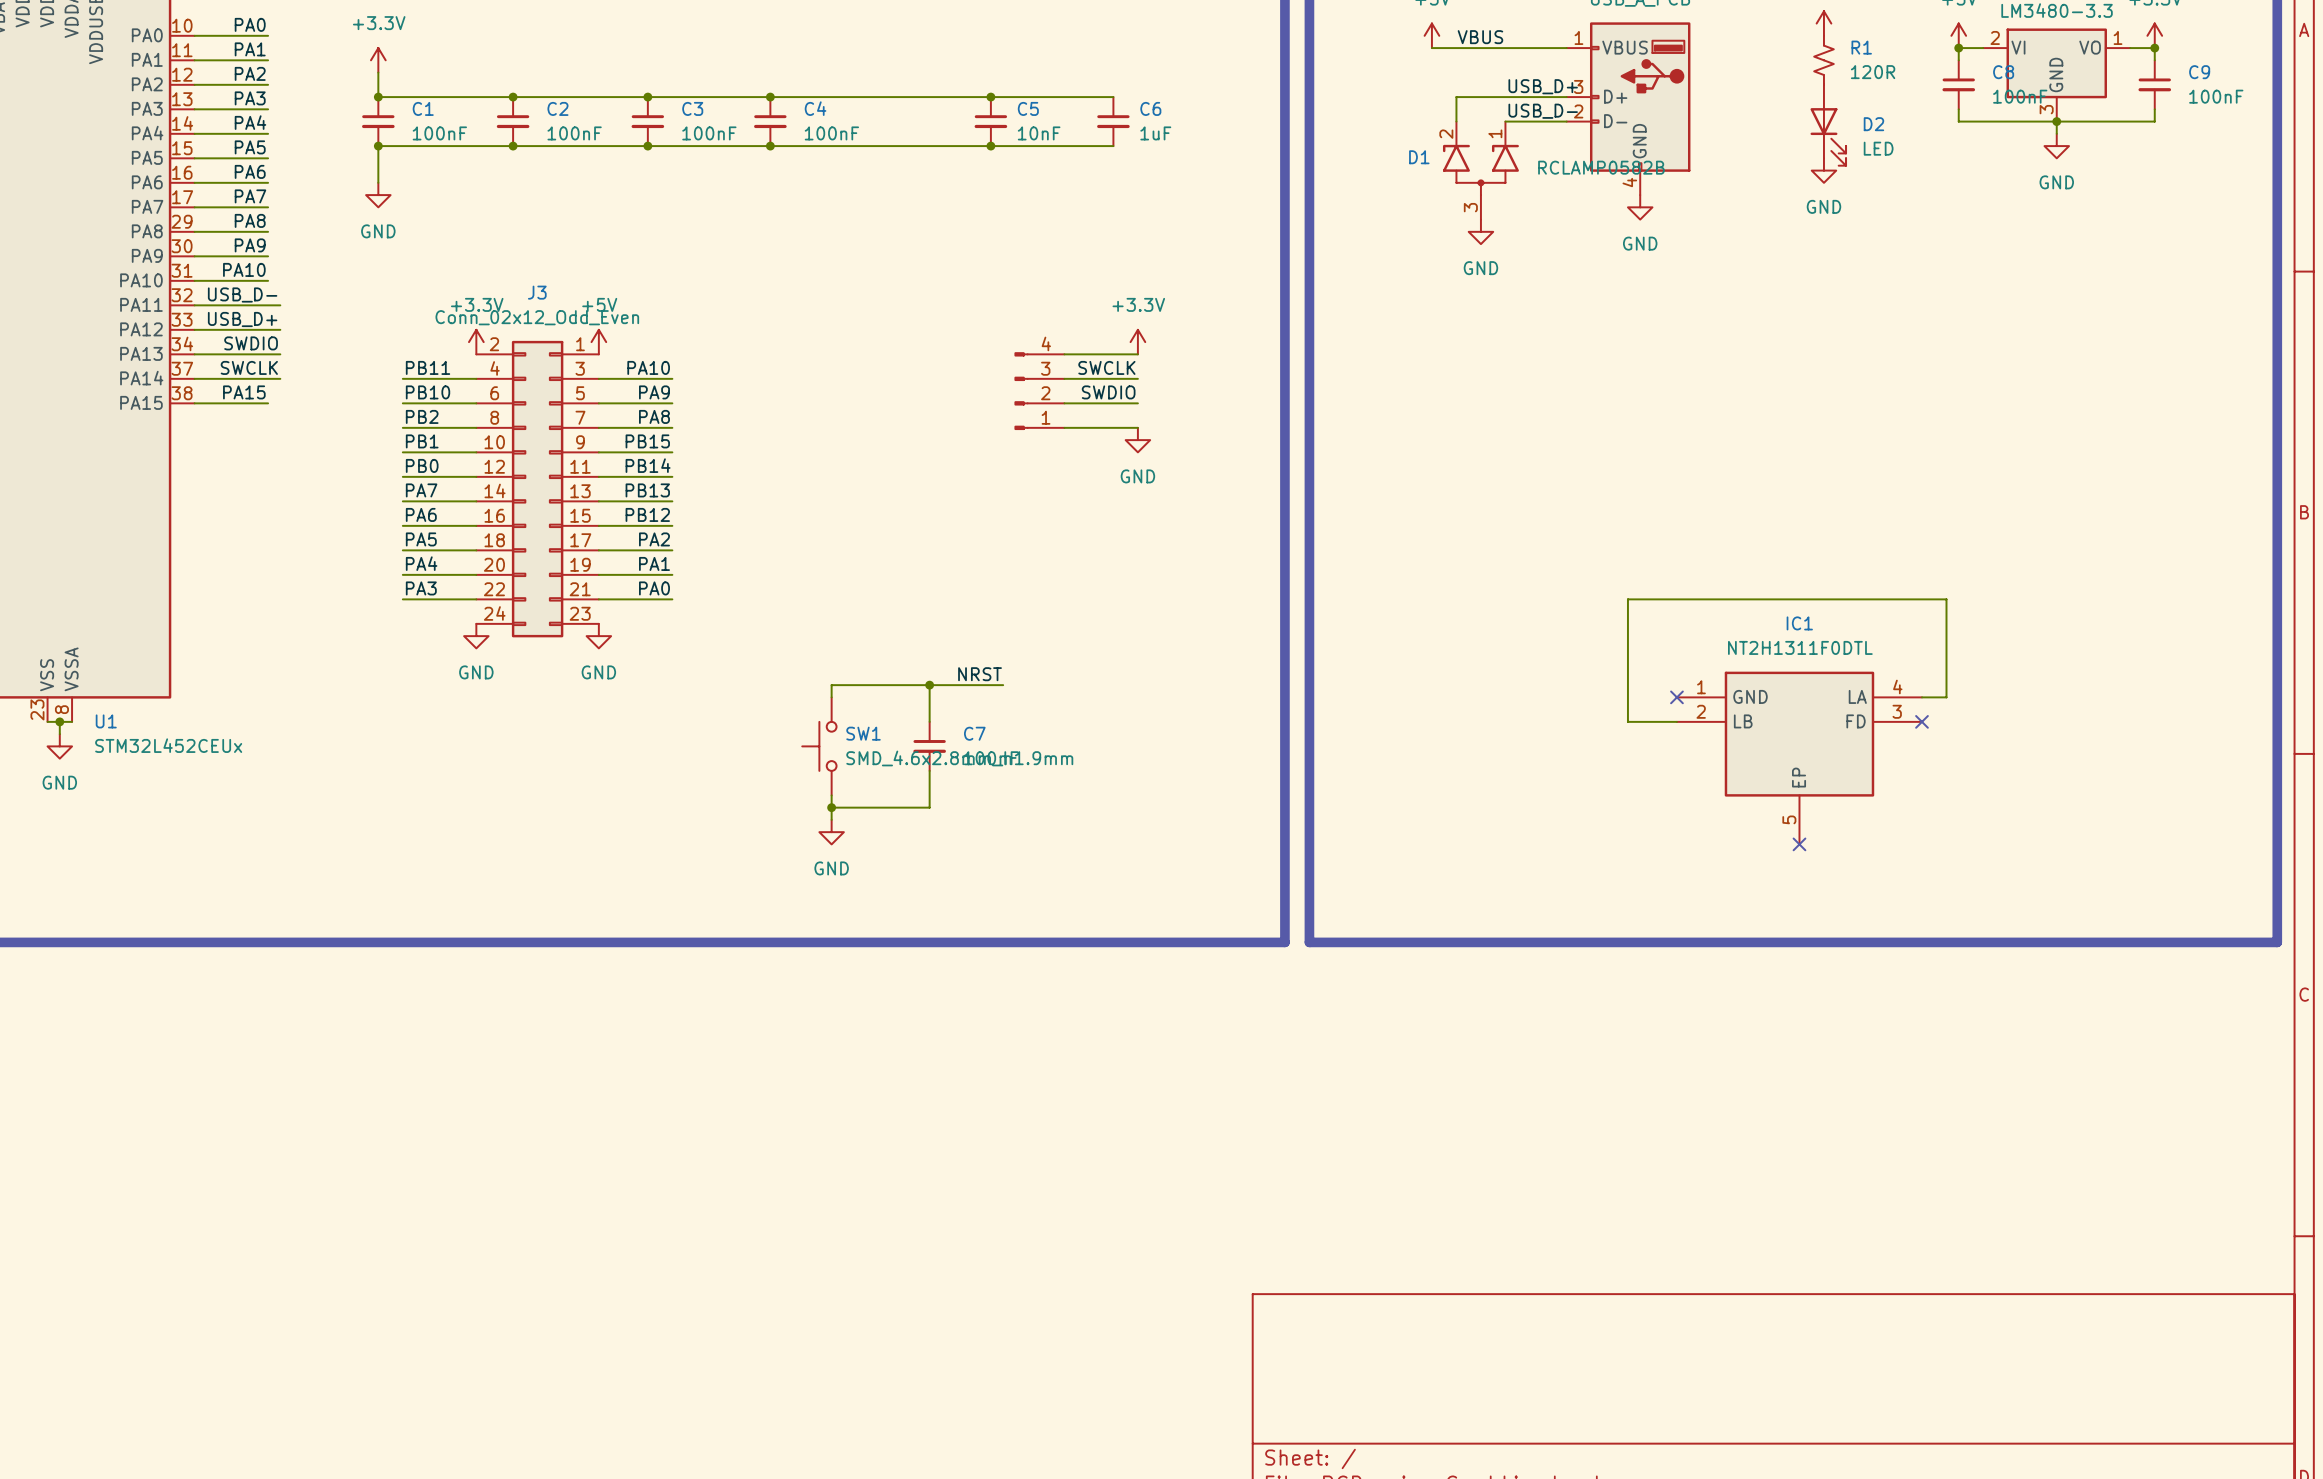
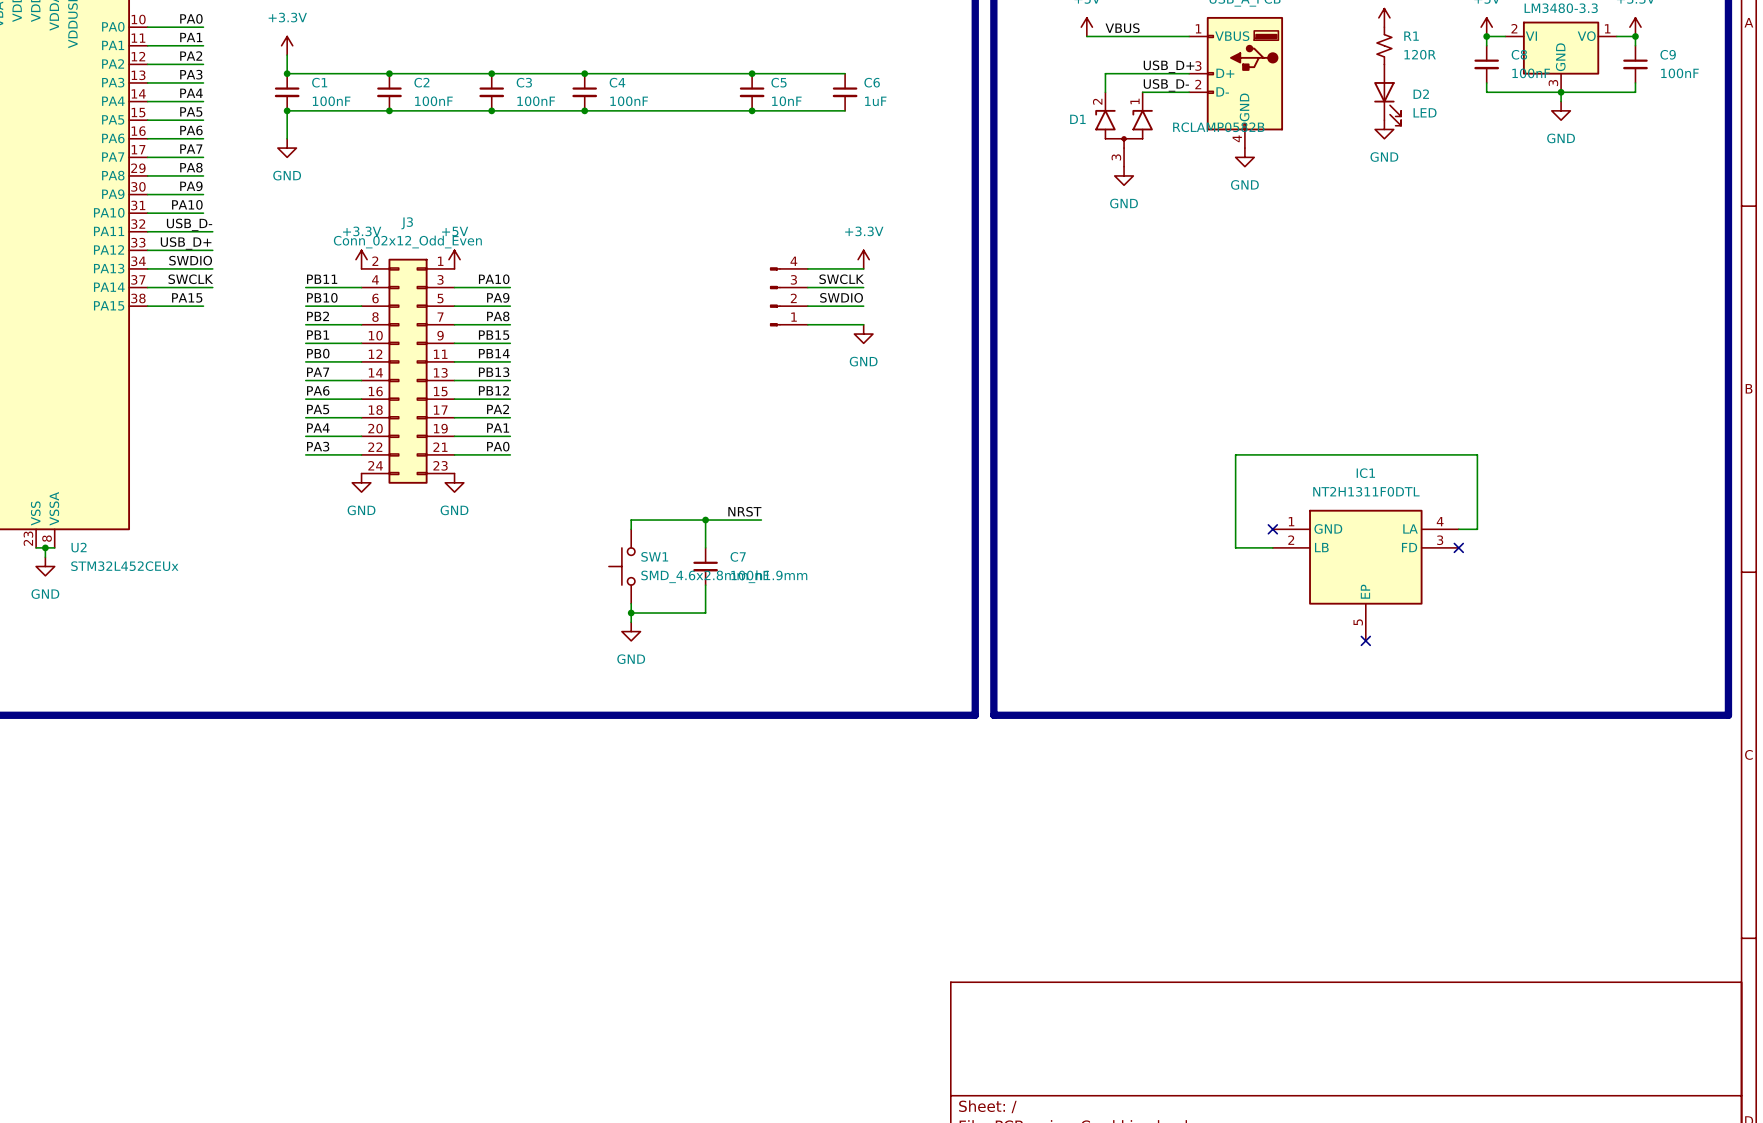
U1 name: U1 (106, 721) -> U2 (79, 547)

